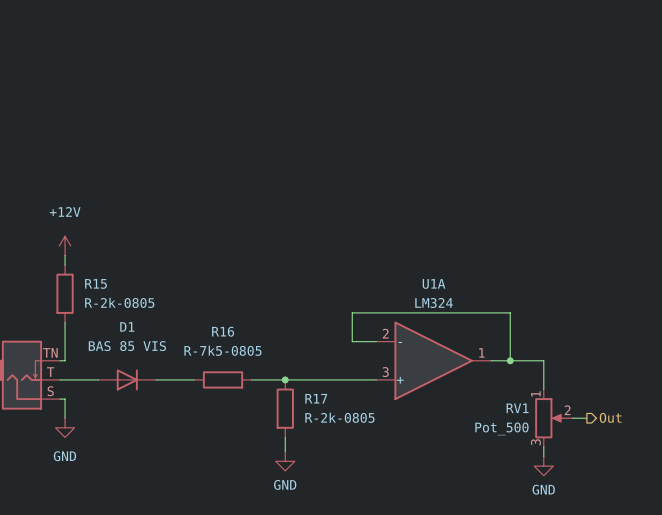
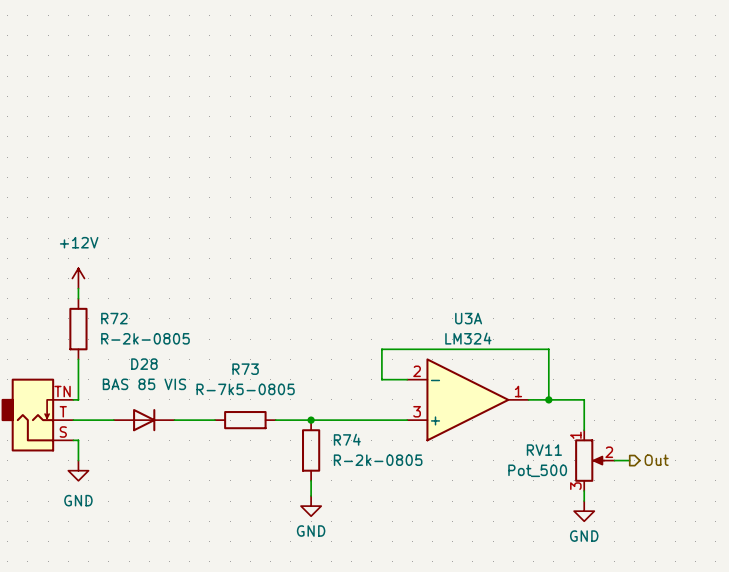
R15 name: R15 (95, 283) -> R72 (114, 318)
U1A name: U1A (434, 283) -> U3A (468, 318)
D1 name: D1 (127, 326) -> D28 (144, 364)
R16 name: R16 (223, 331) -> R73 (245, 369)
R17 name: R17 (316, 398) -> R74 (347, 439)
RV1 name: RV1 (517, 408) -> RV11 (544, 450)

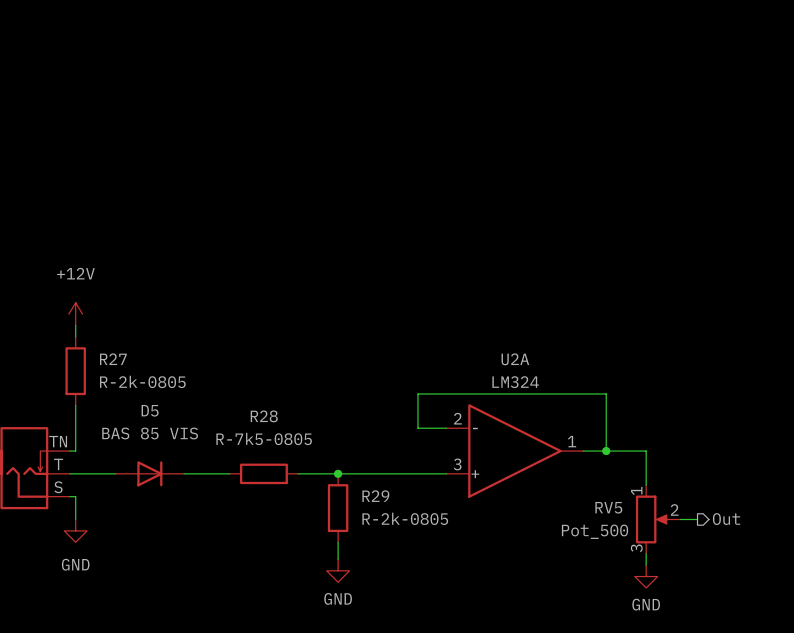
R72 name: R72 (114, 318) -> R27 (113, 359)
U3A name: U3A (468, 318) -> U2A (515, 359)
D28 name: D28 (144, 364) -> D5 (150, 410)
R73 name: R73 (245, 369) -> R28 (264, 416)
R74 name: R74 (347, 439) -> R29 (375, 496)
RV11 name: RV11 (544, 450) -> RV5 (608, 507)

